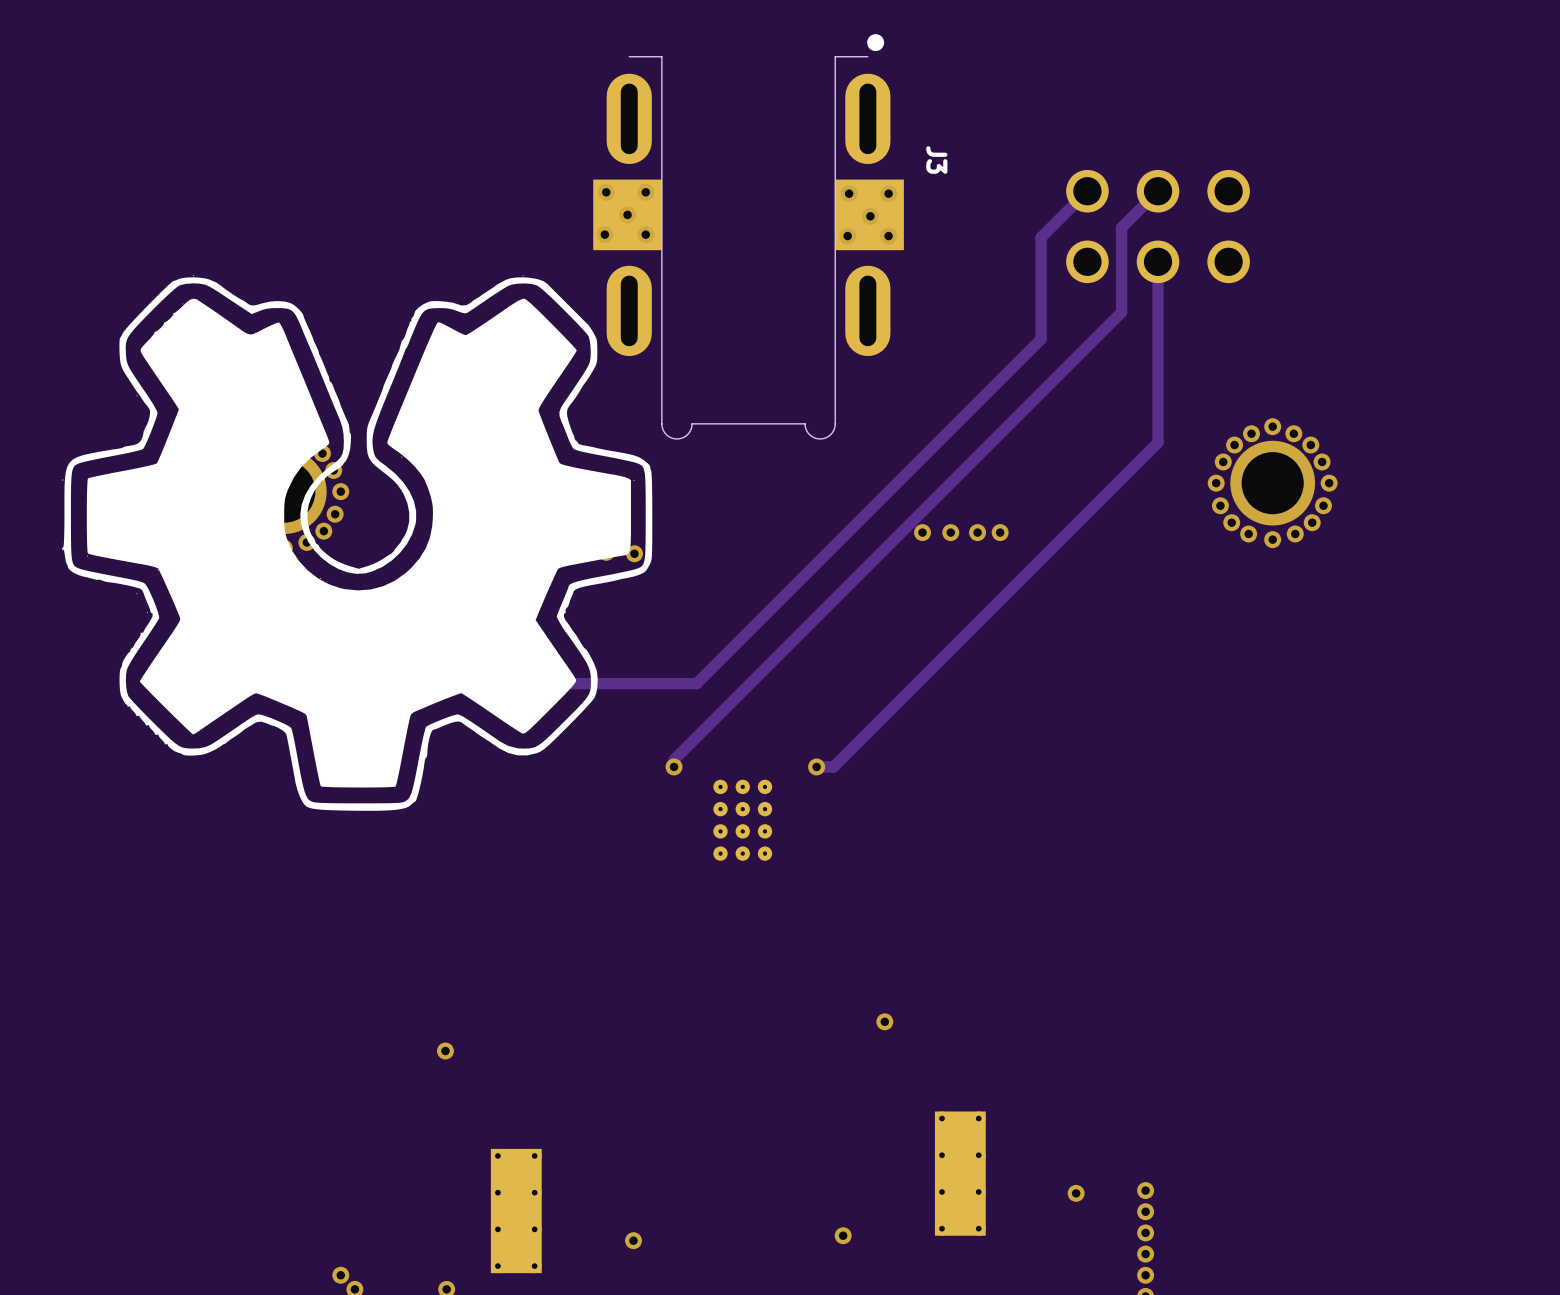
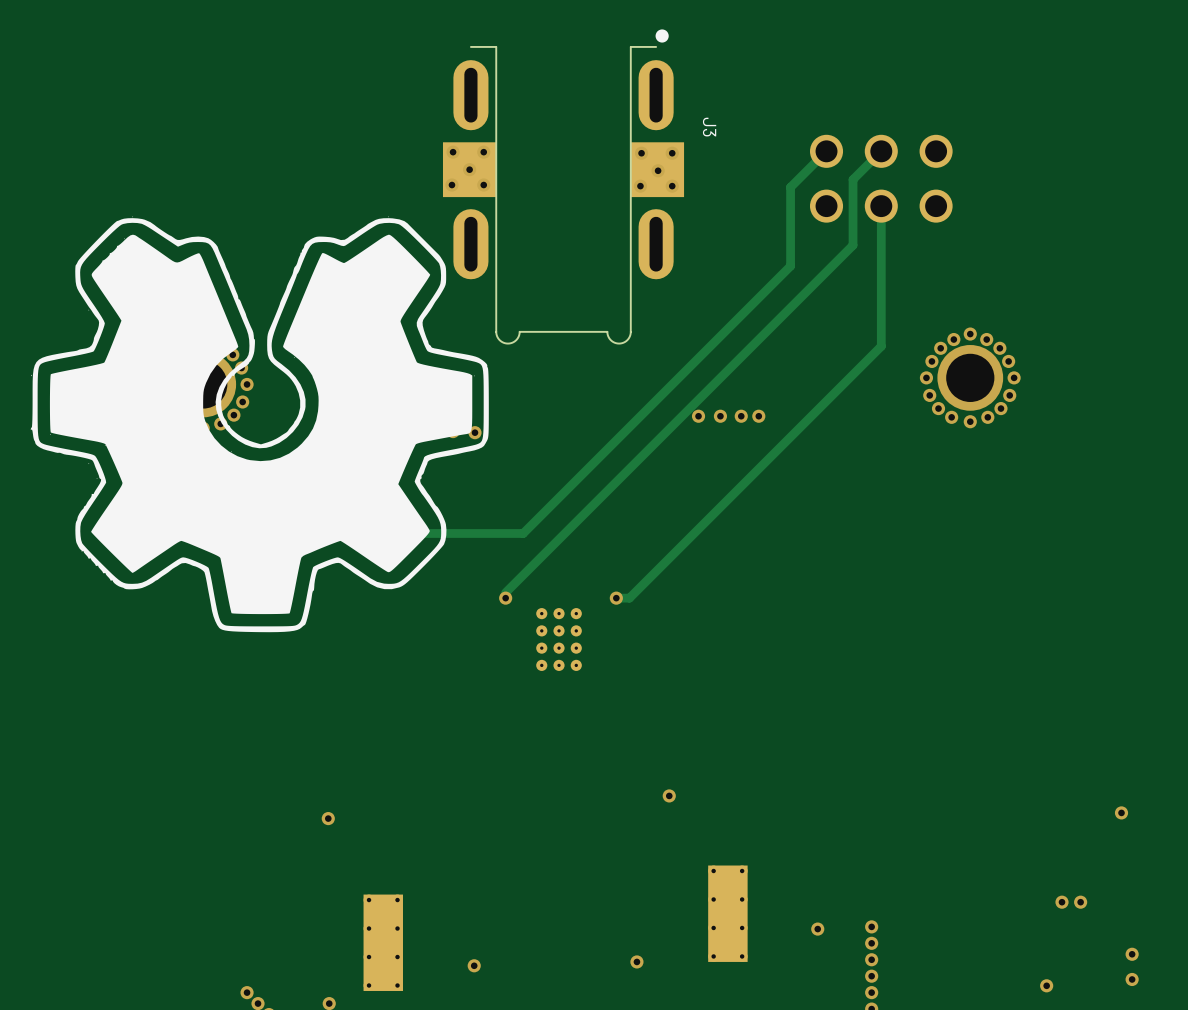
via: none -> (1121, 812)
via: none -> (1062, 902)
via: none -> (1080, 902)
via: none -> (1132, 954)
via: none -> (1132, 979)
via: none -> (1046, 985)

